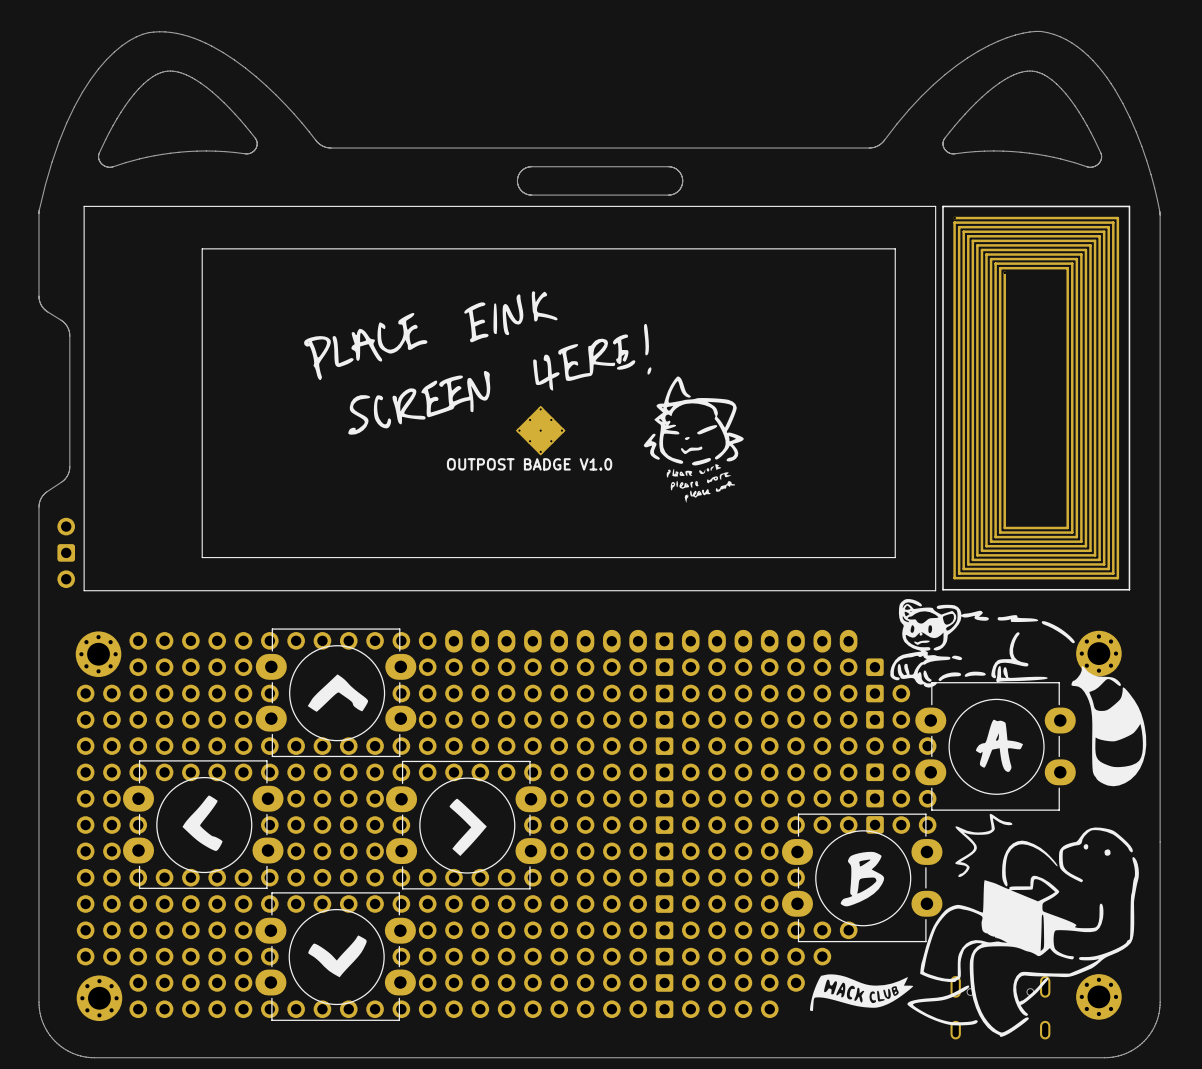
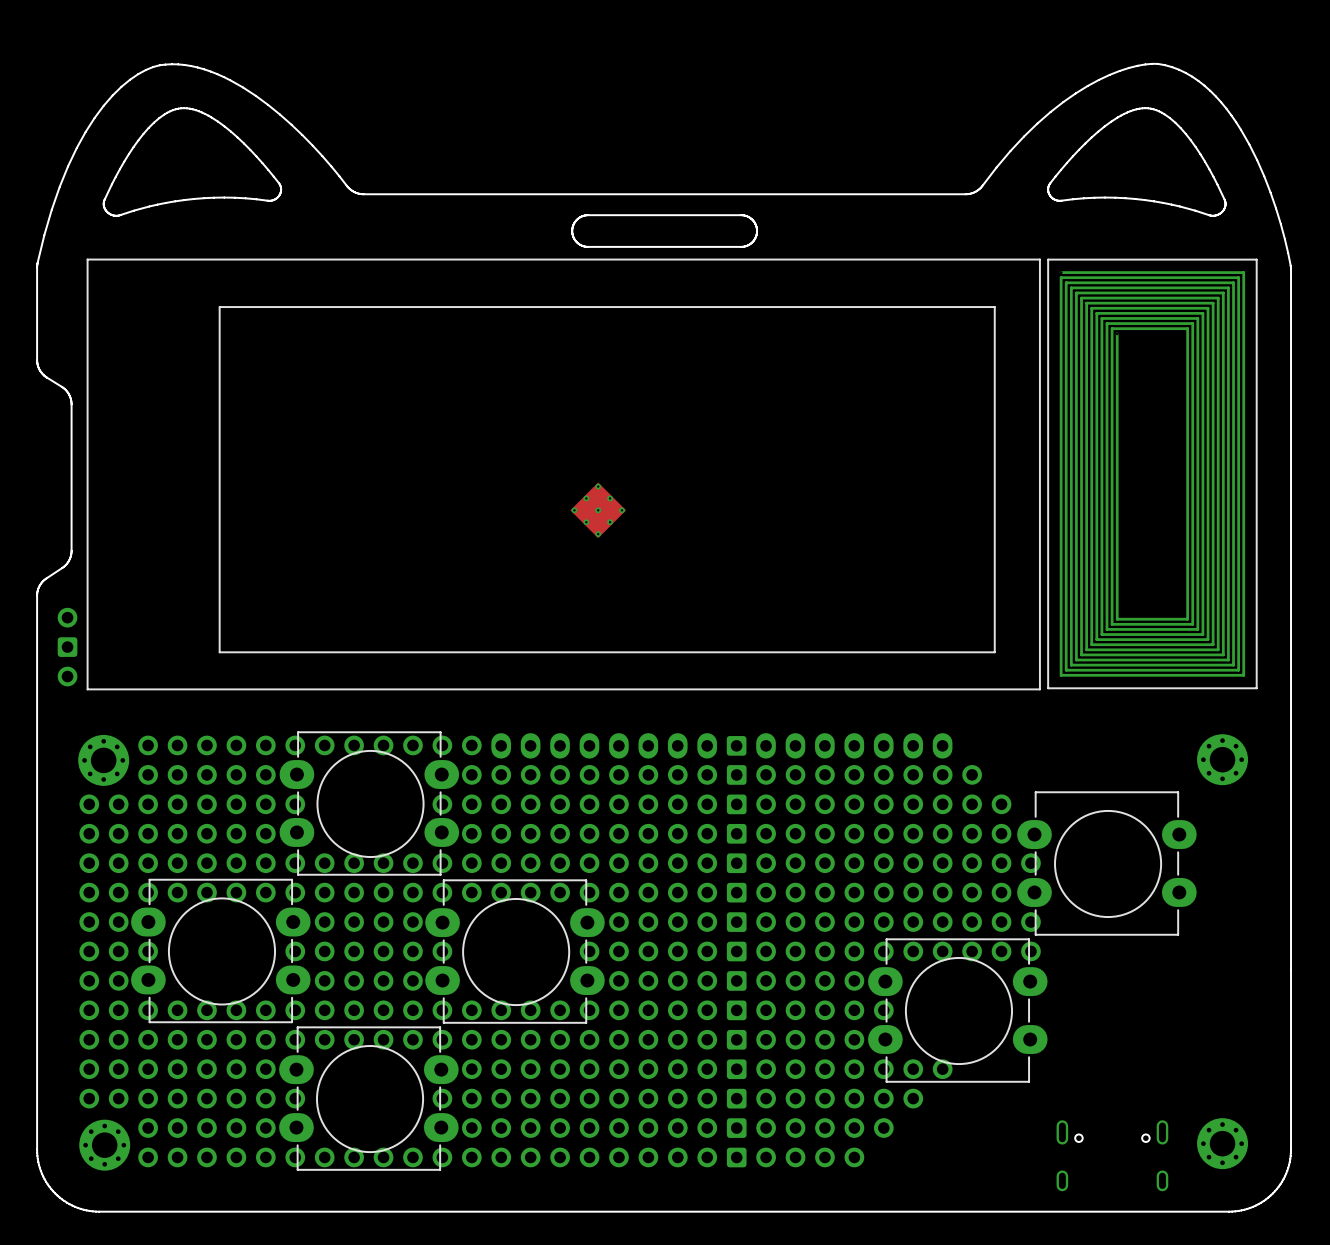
drawing: [182, 291, 1147, 1037] -> none
text: OUTPOST BADGE V1.0 (529, 464) -> none
part footprint: [866, 658, 884, 729] -> [962, 794, 982, 815]
part: none -> (972, 774)
part: none -> (972, 833)
part footprint: [866, 763, 884, 834] -> [962, 912, 982, 932]
part: none -> (972, 892)
part: none -> (972, 951)

